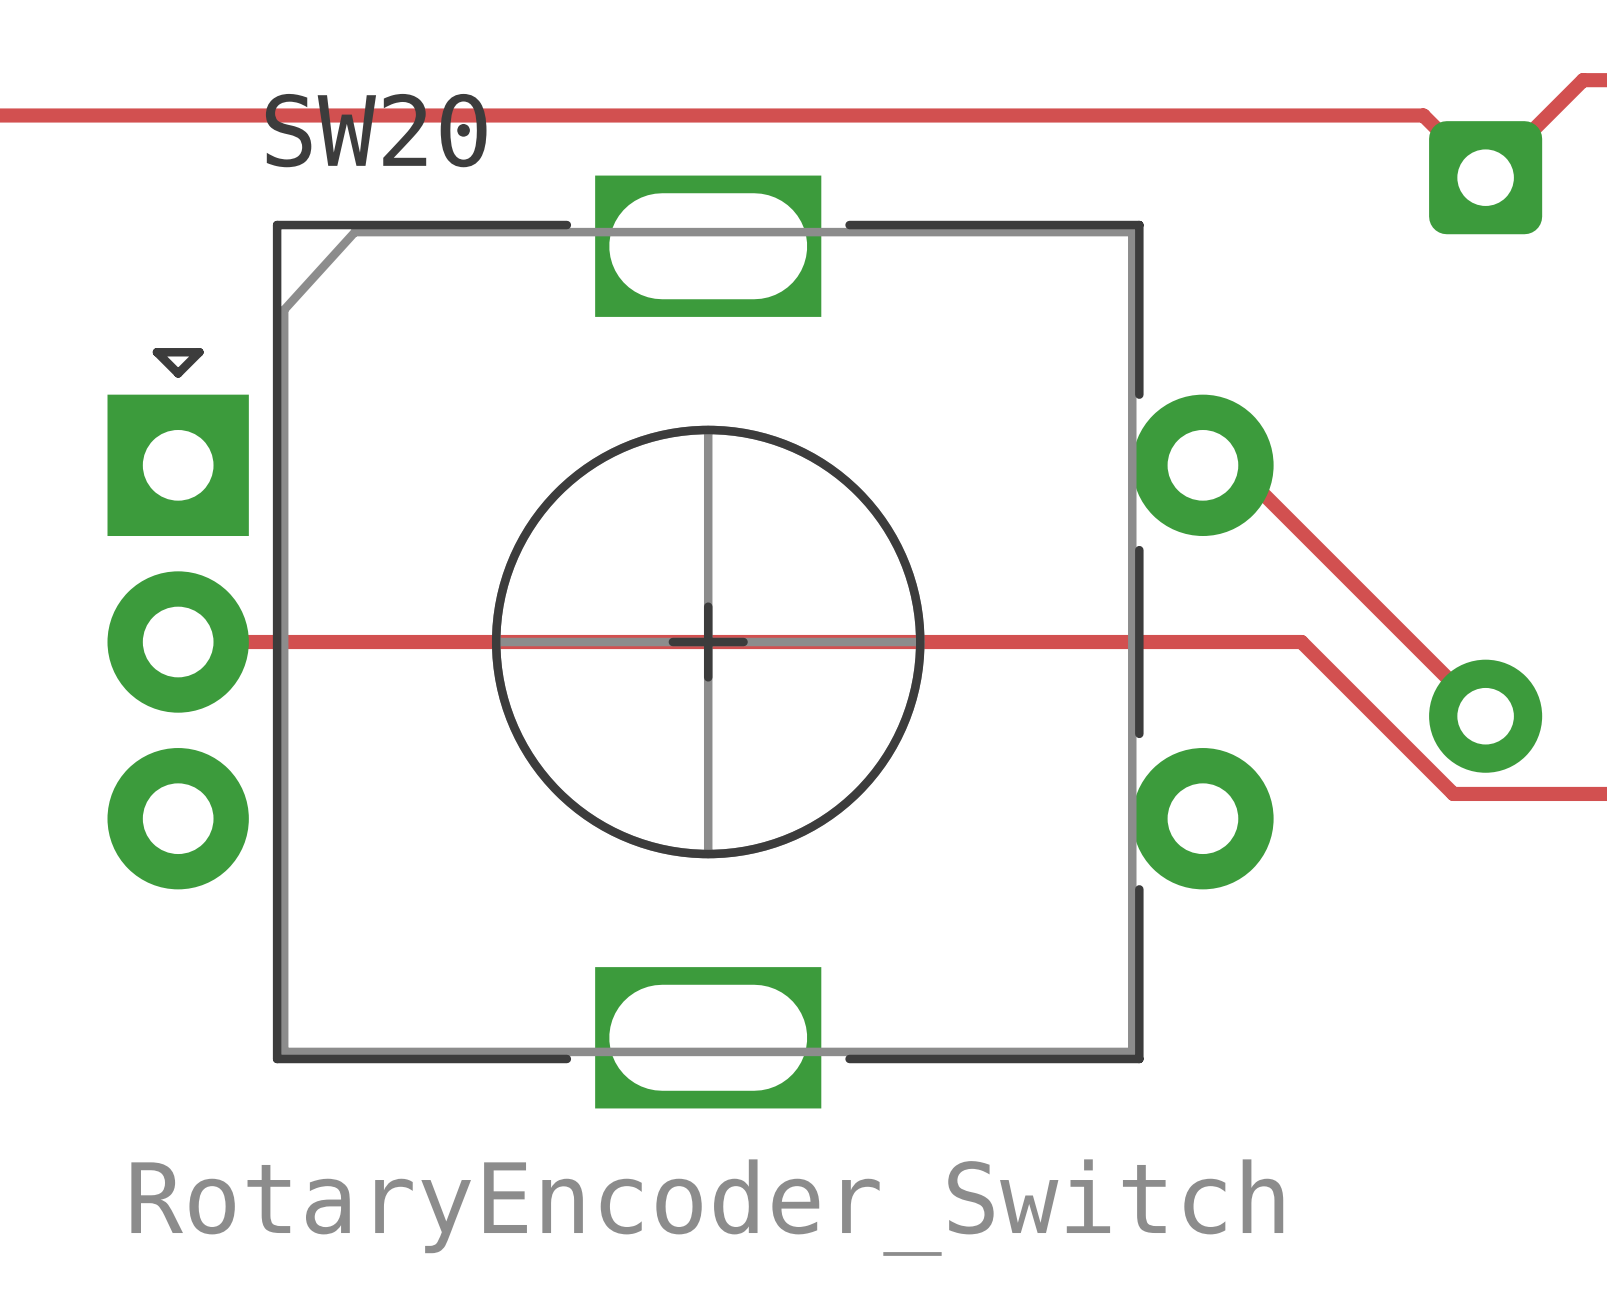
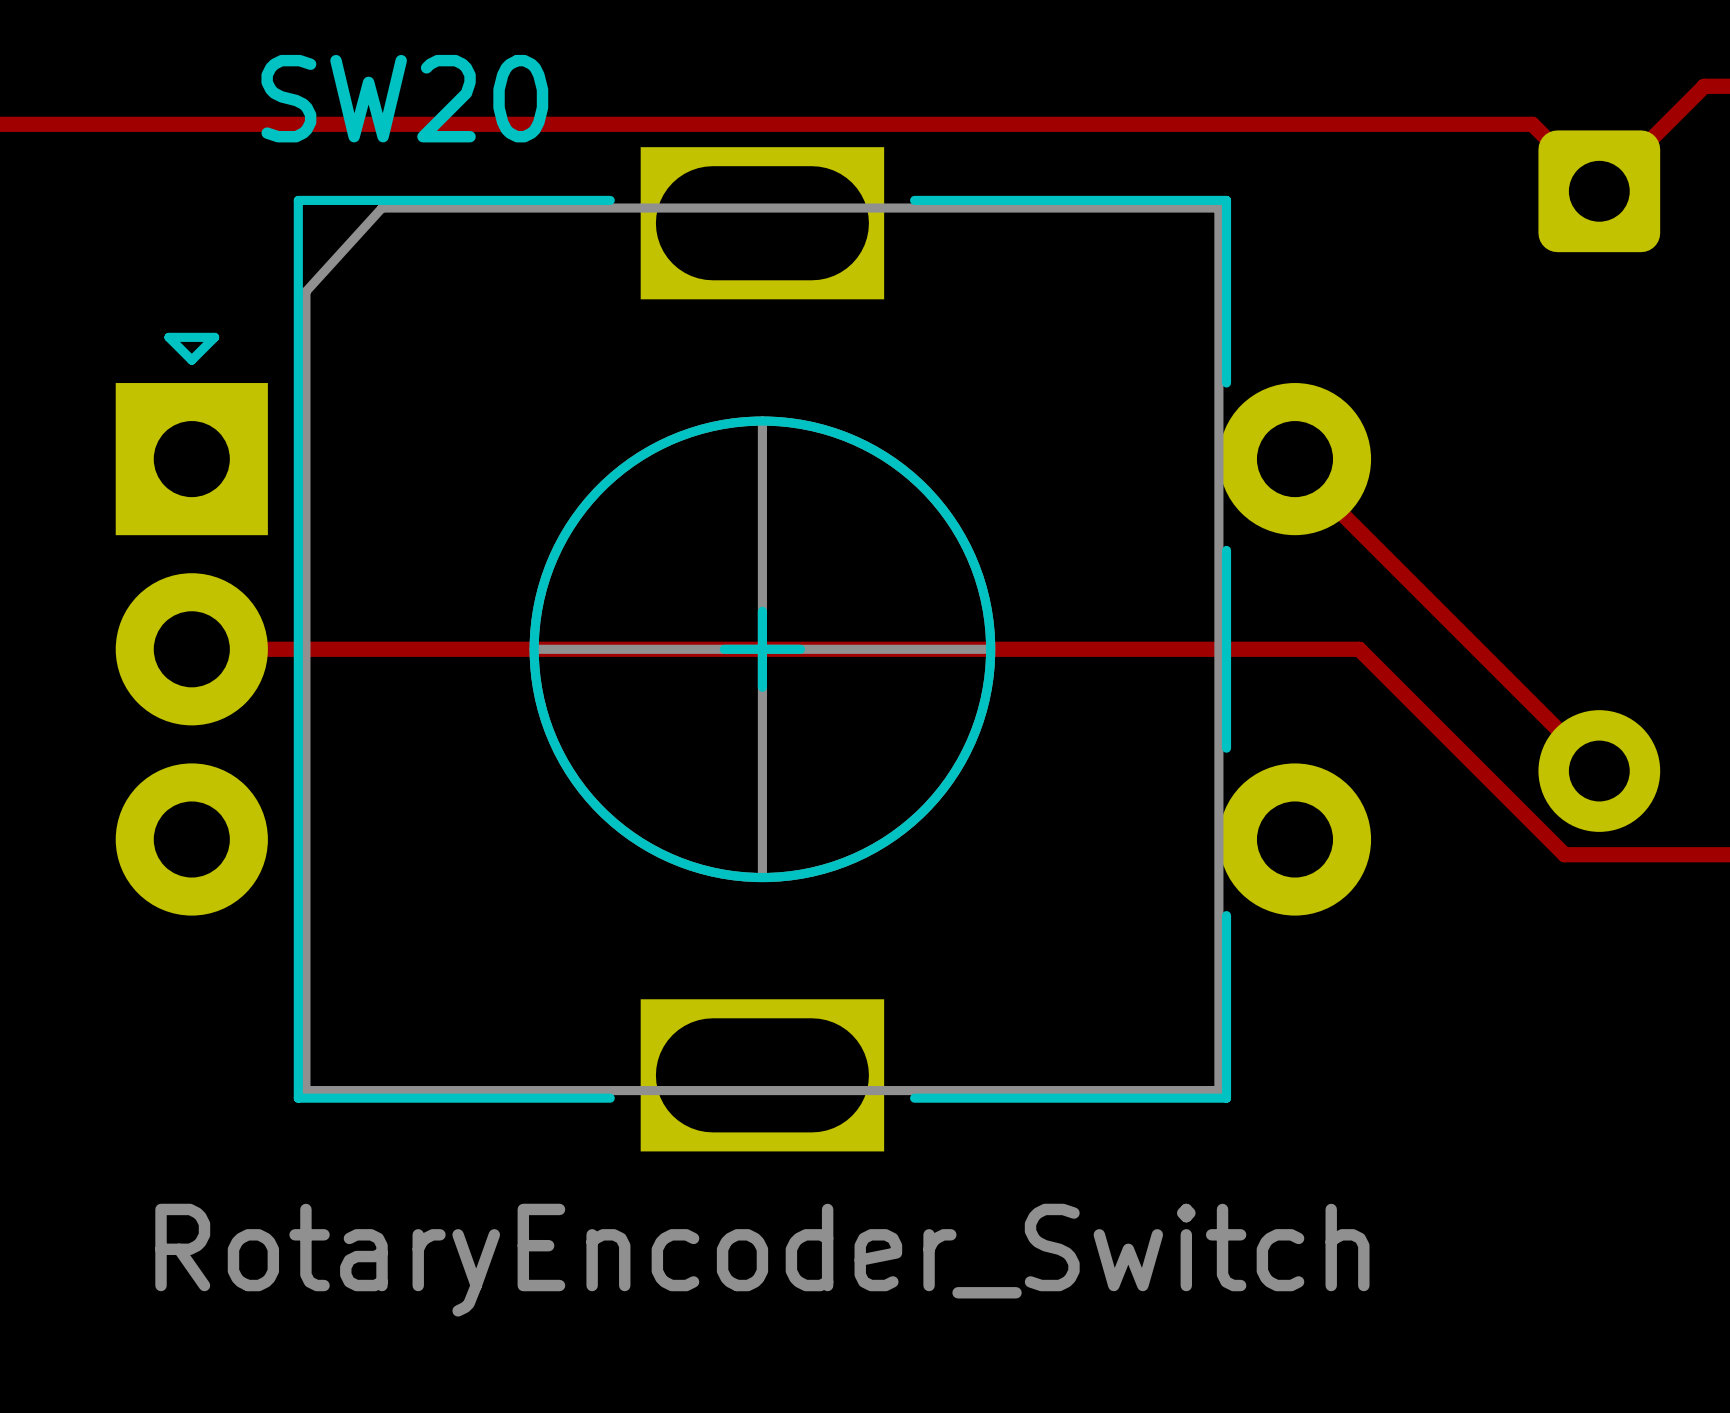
track: (178, 642) (1301, 642) -> (191, 649) (1359, 649) (1401, 691)
SW20 position: (690, 642) -> (743, 649)

